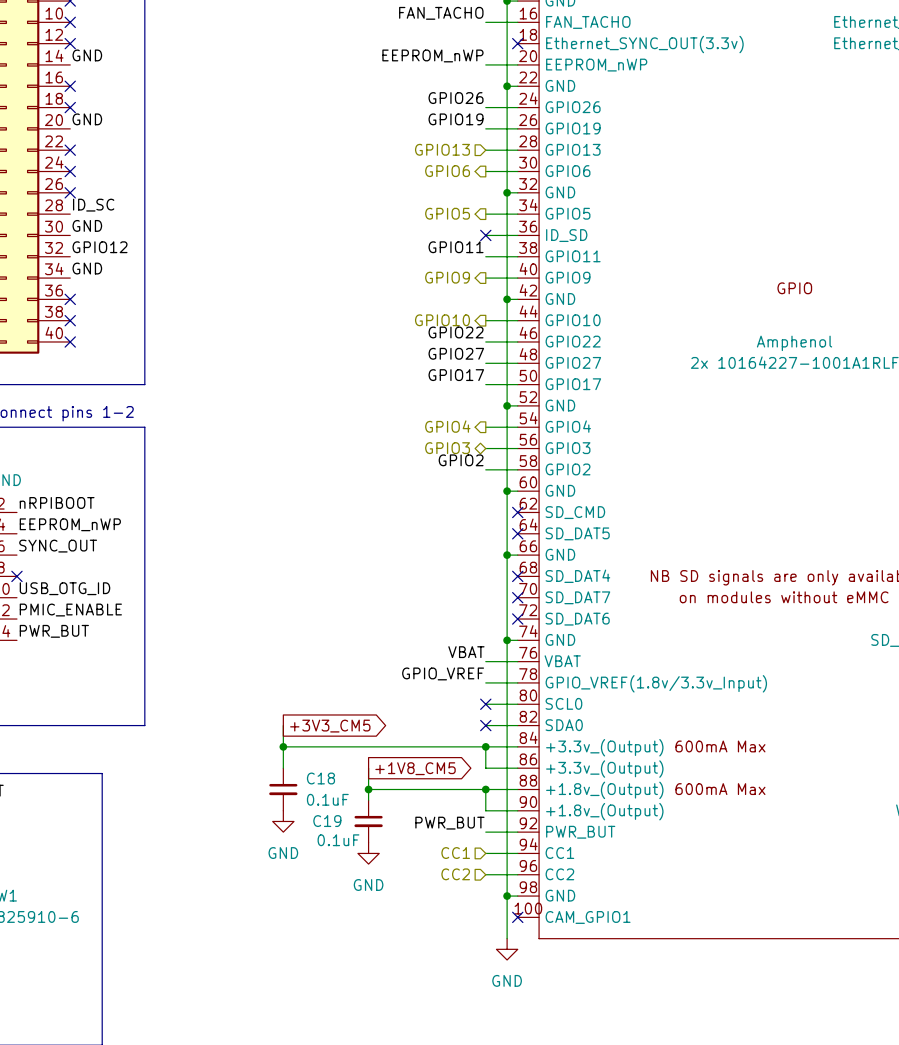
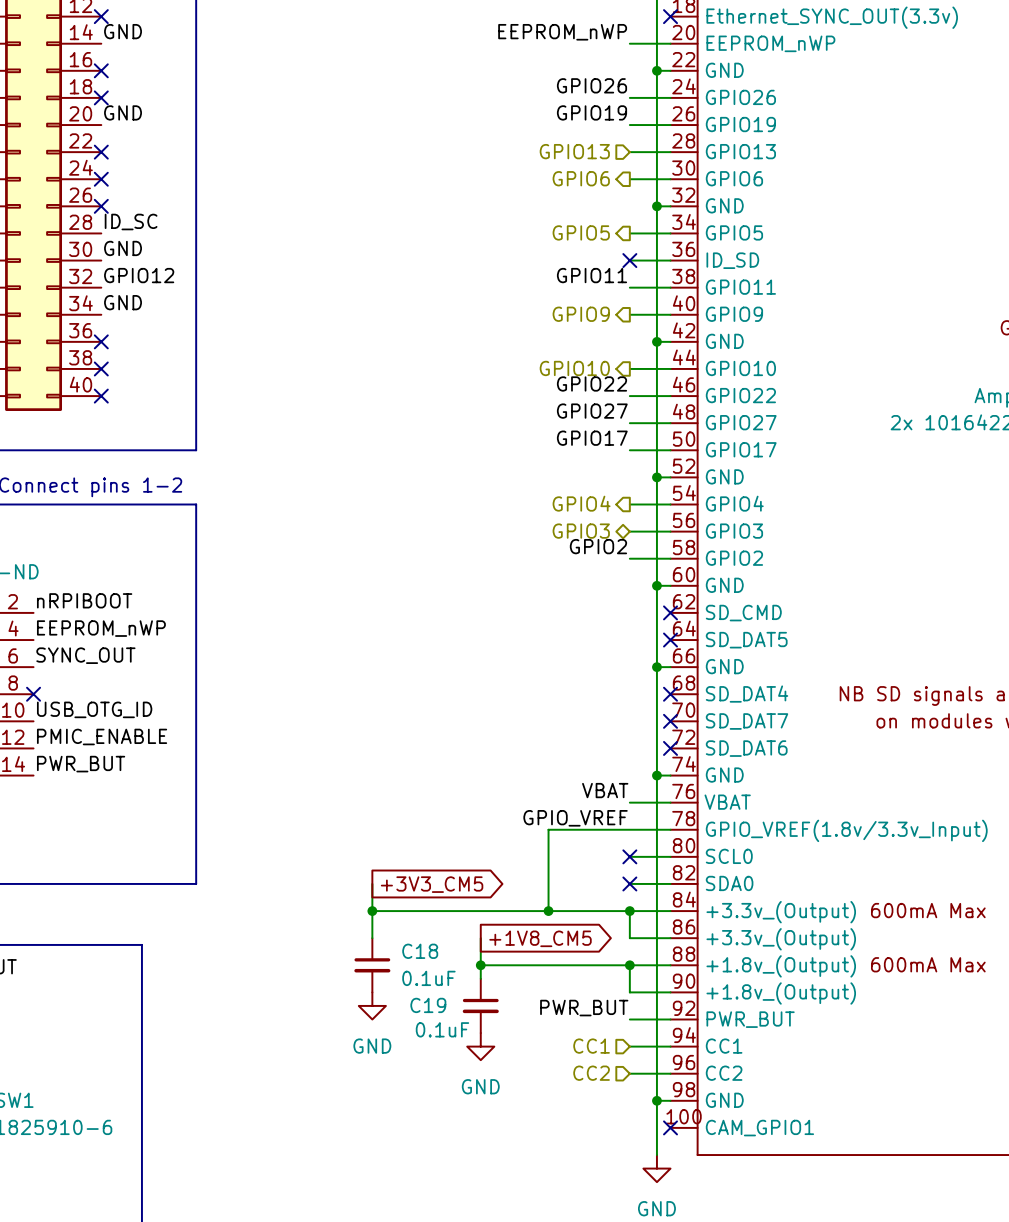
wire: none -> (629, 829) (548, 829) (548, 911)
junction: none -> (548, 911)

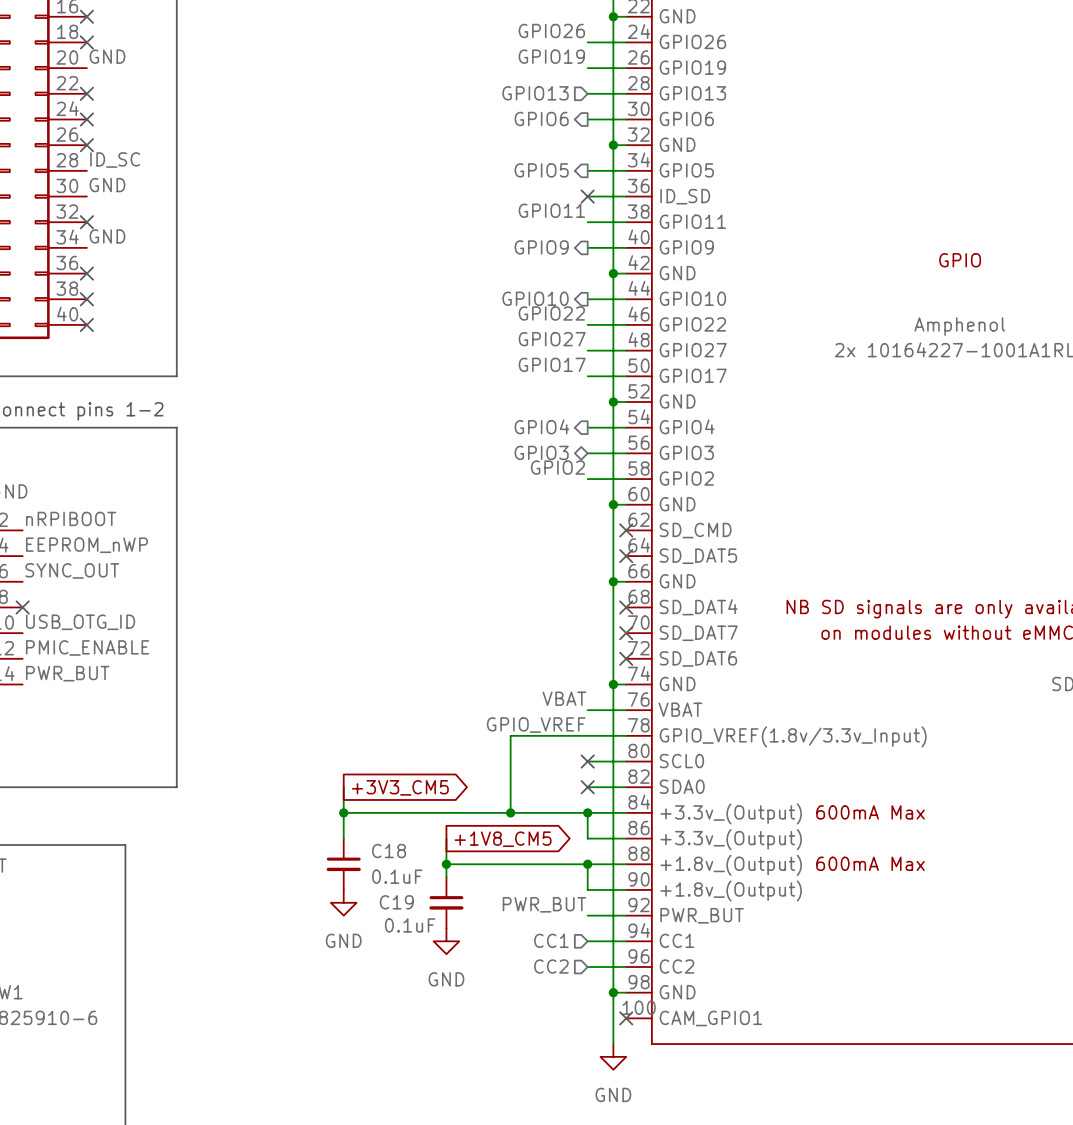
label: GPIO12 (139, 275) -> none
no-connect mark: none -> (86, 222)

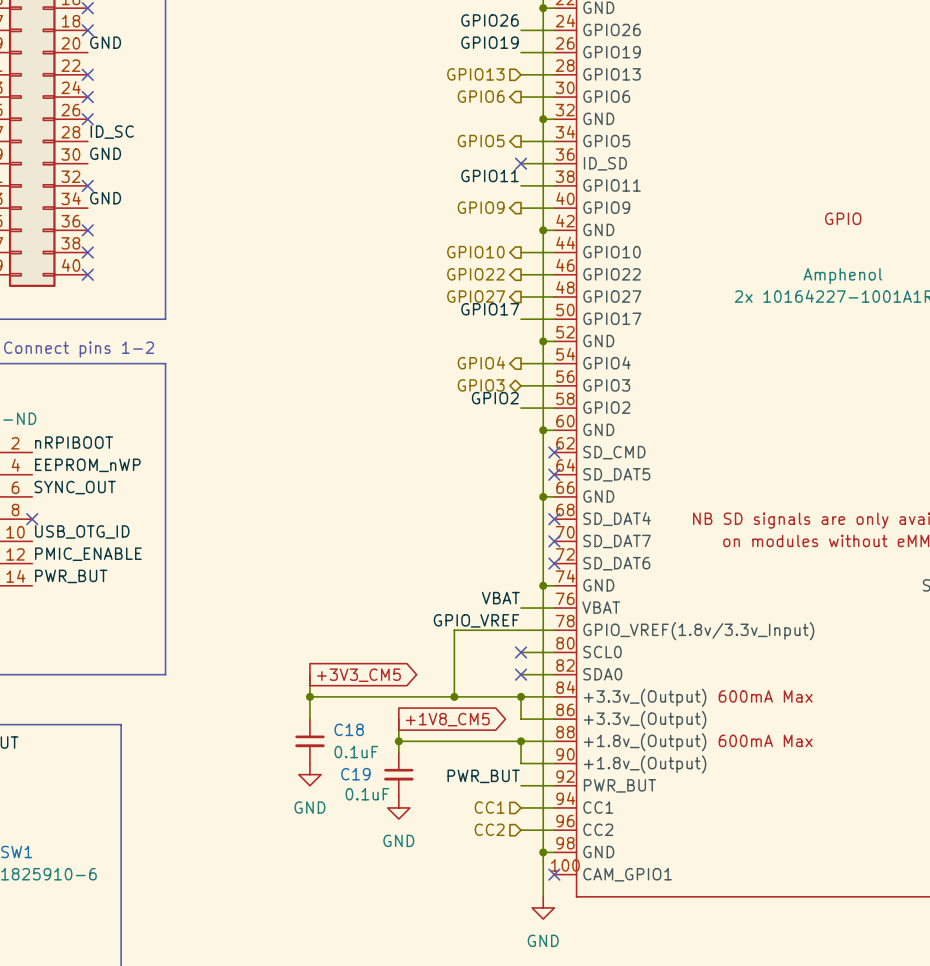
label: GPIO22 (551, 313) -> none
hierarchical label: none -> GPIO22 (475, 274)
label: GPIO27 (552, 339) -> none
hierarchical label: none -> GPIO27 (476, 296)

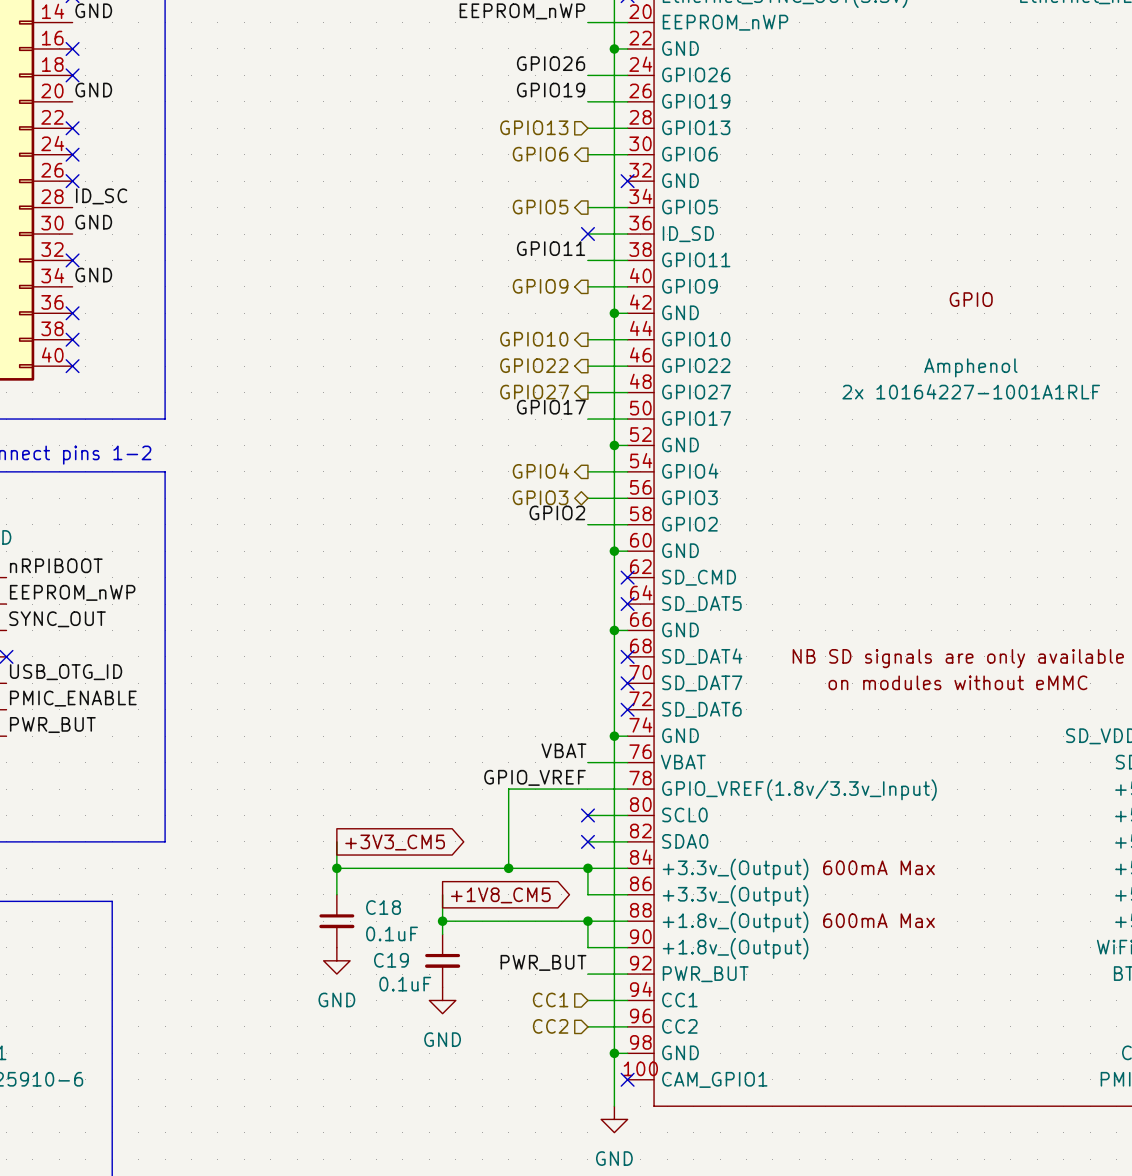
wire: (543, 119) (554, 119) -> none
junction: (543, 119) -> none
no-connect mark: none -> (627, 181)

